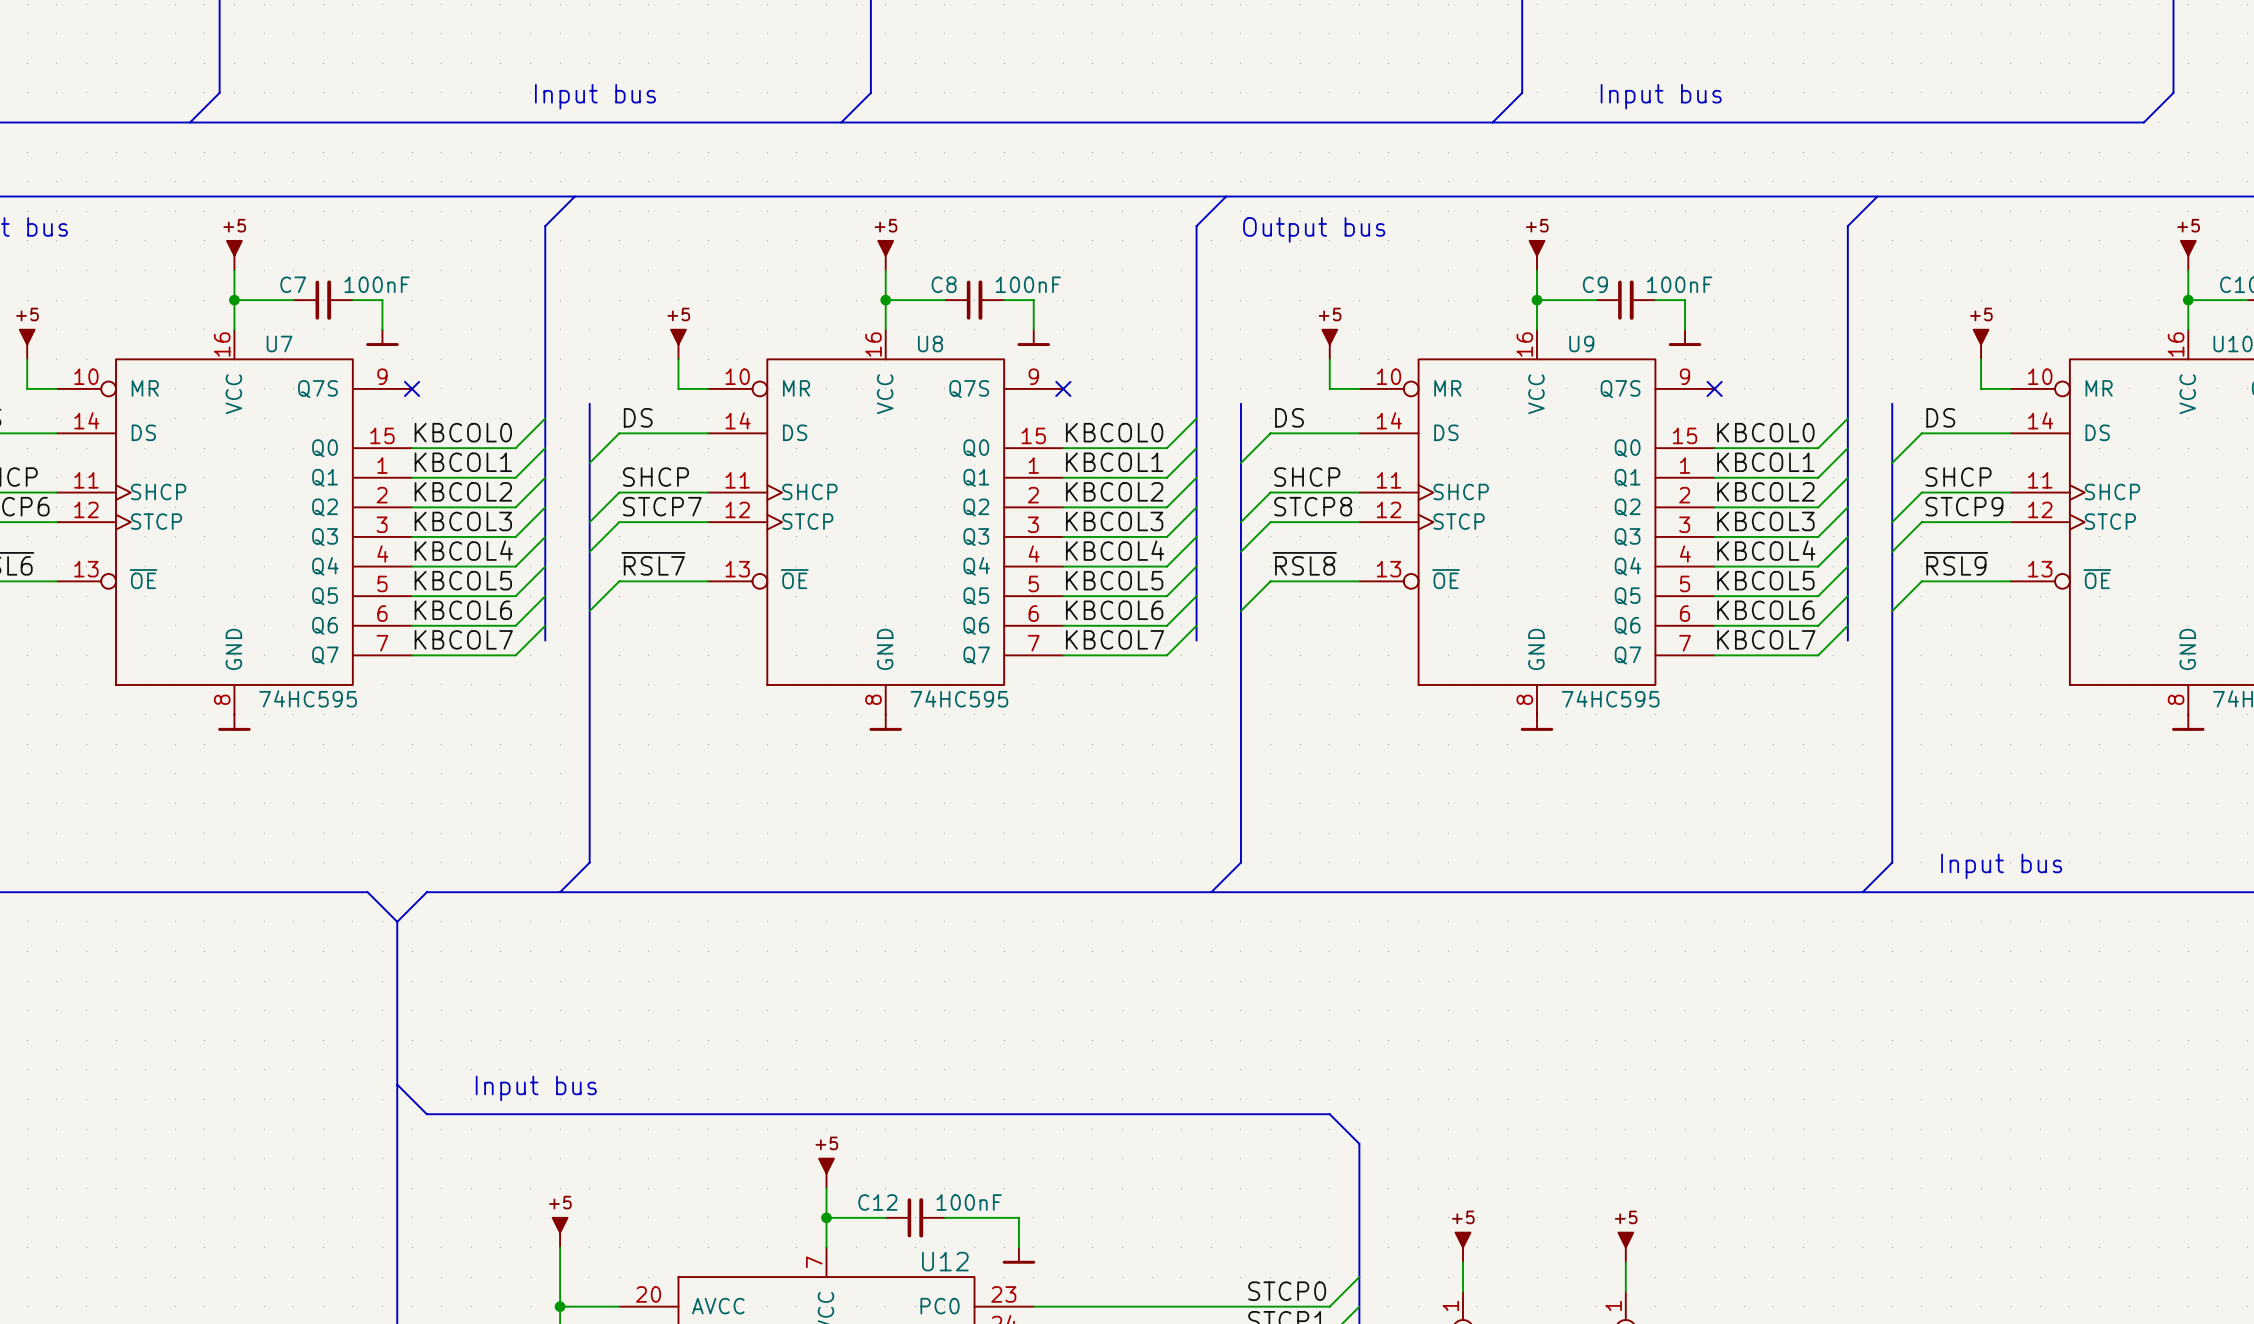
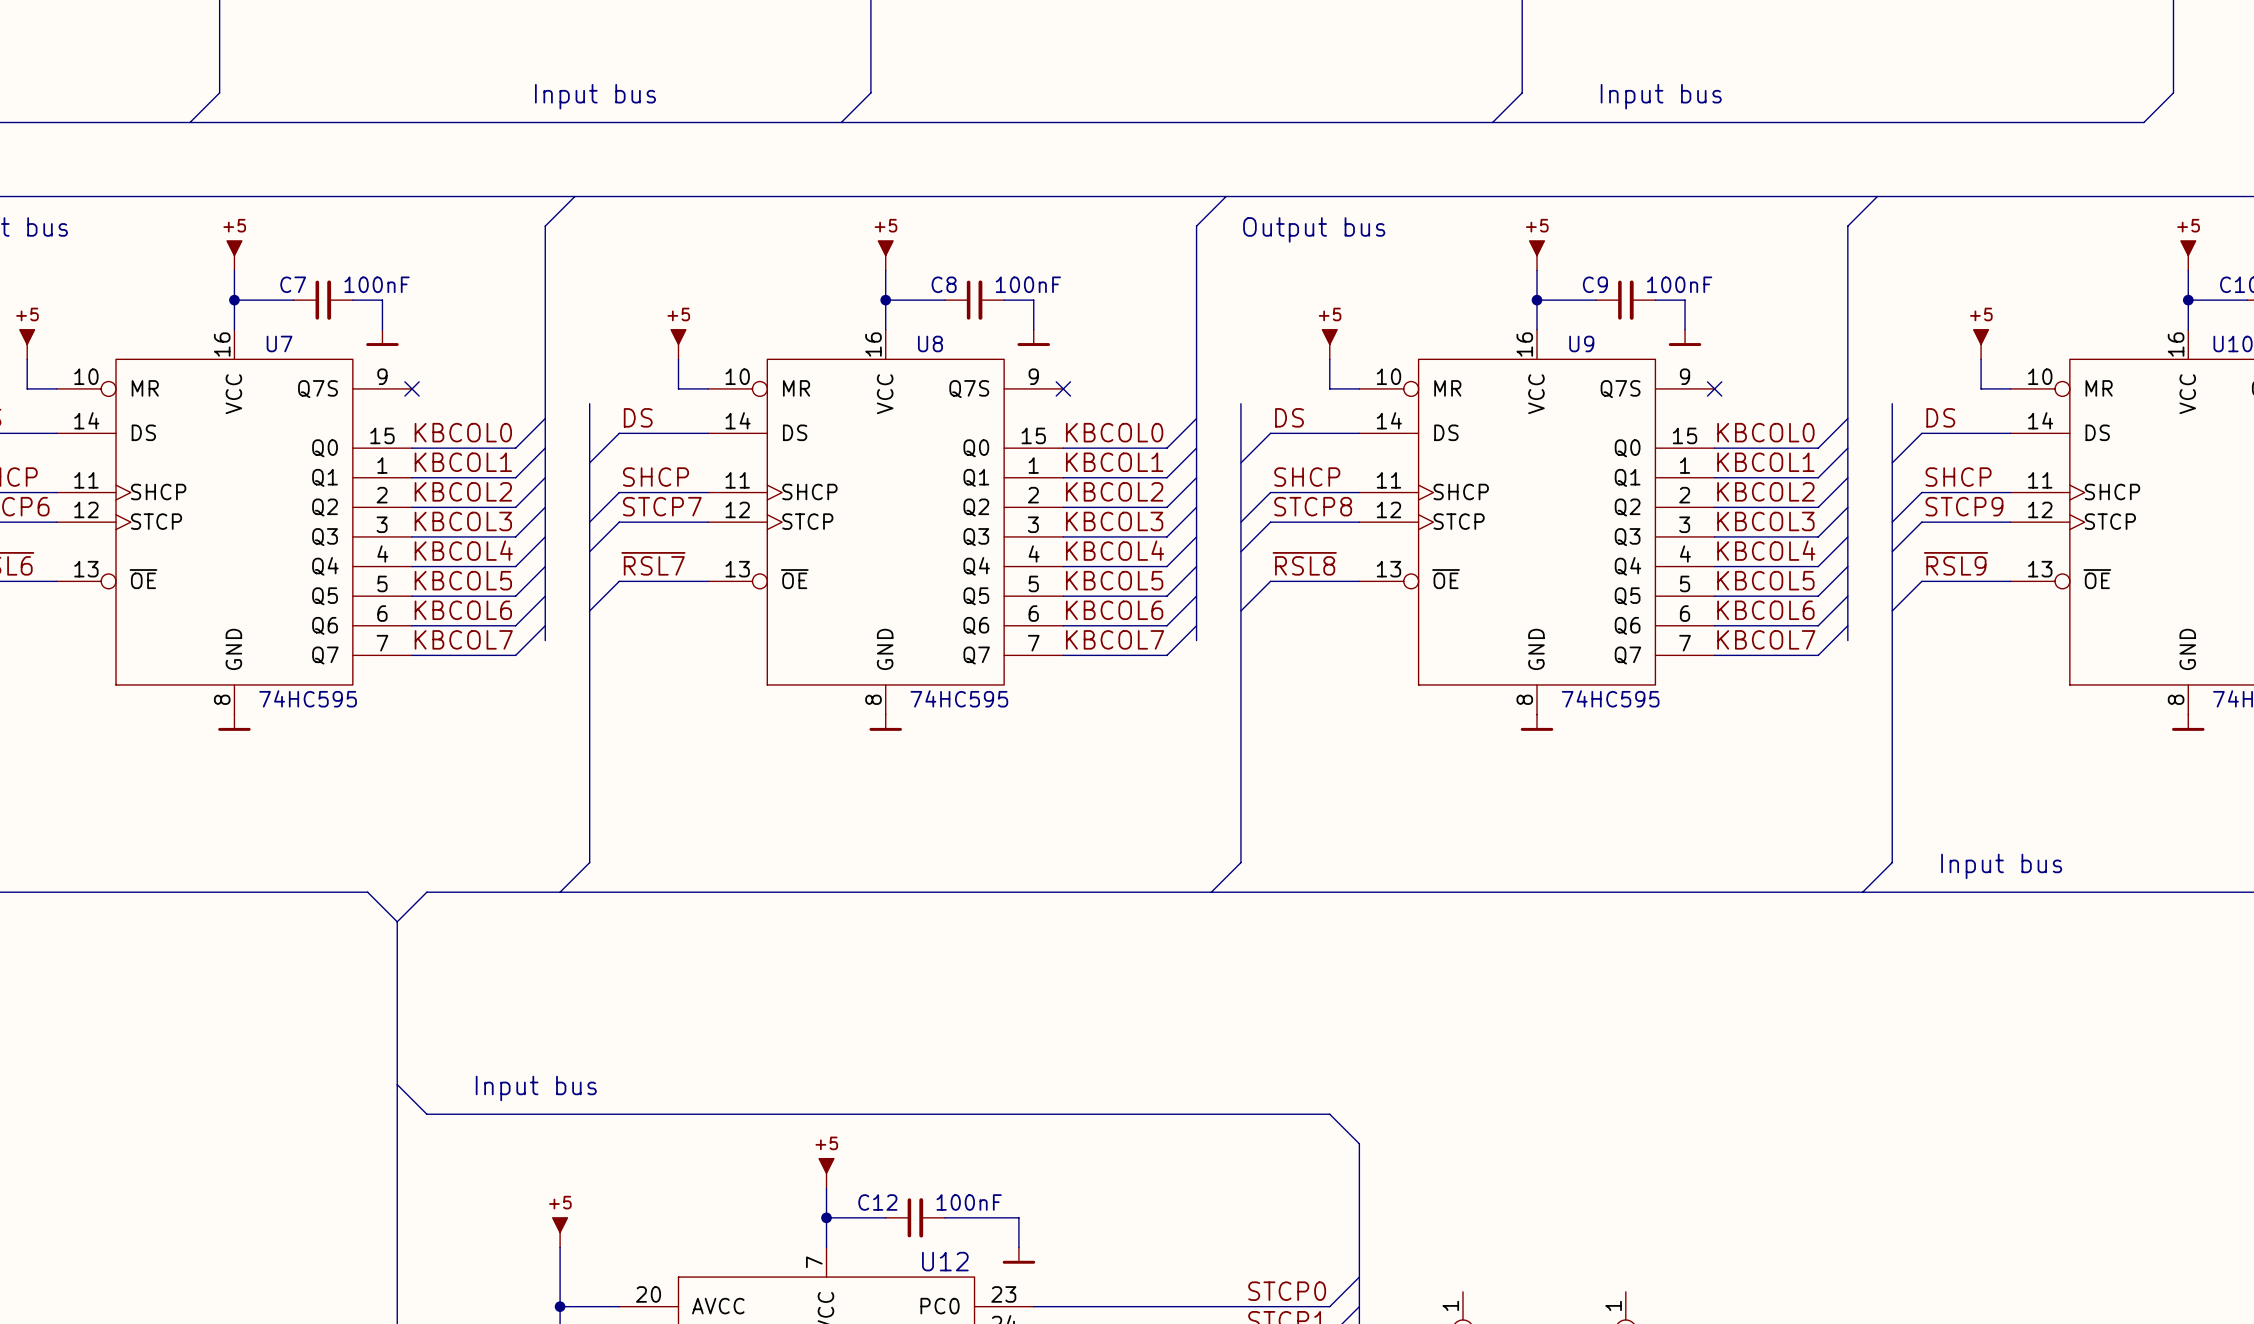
power symbol: (1462, 1247) -> none
power symbol: (1625, 1247) -> none
wire: (1462, 1262) (1462, 1291) -> none
wire: (1625, 1262) (1625, 1291) -> none

